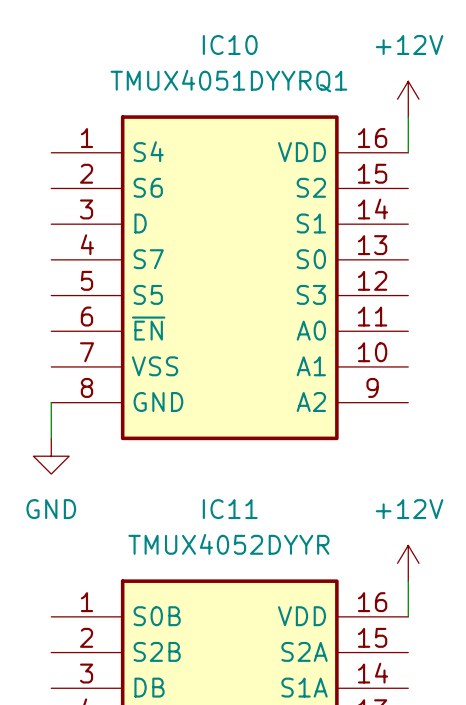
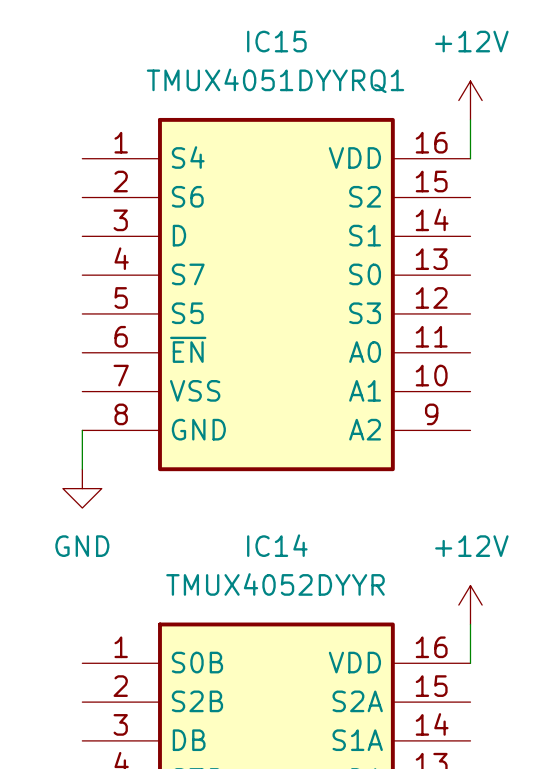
IC10 name: IC10 (230, 45) -> IC15 (276, 41)
IC11 name: IC11 (230, 509) -> IC14 (277, 545)

